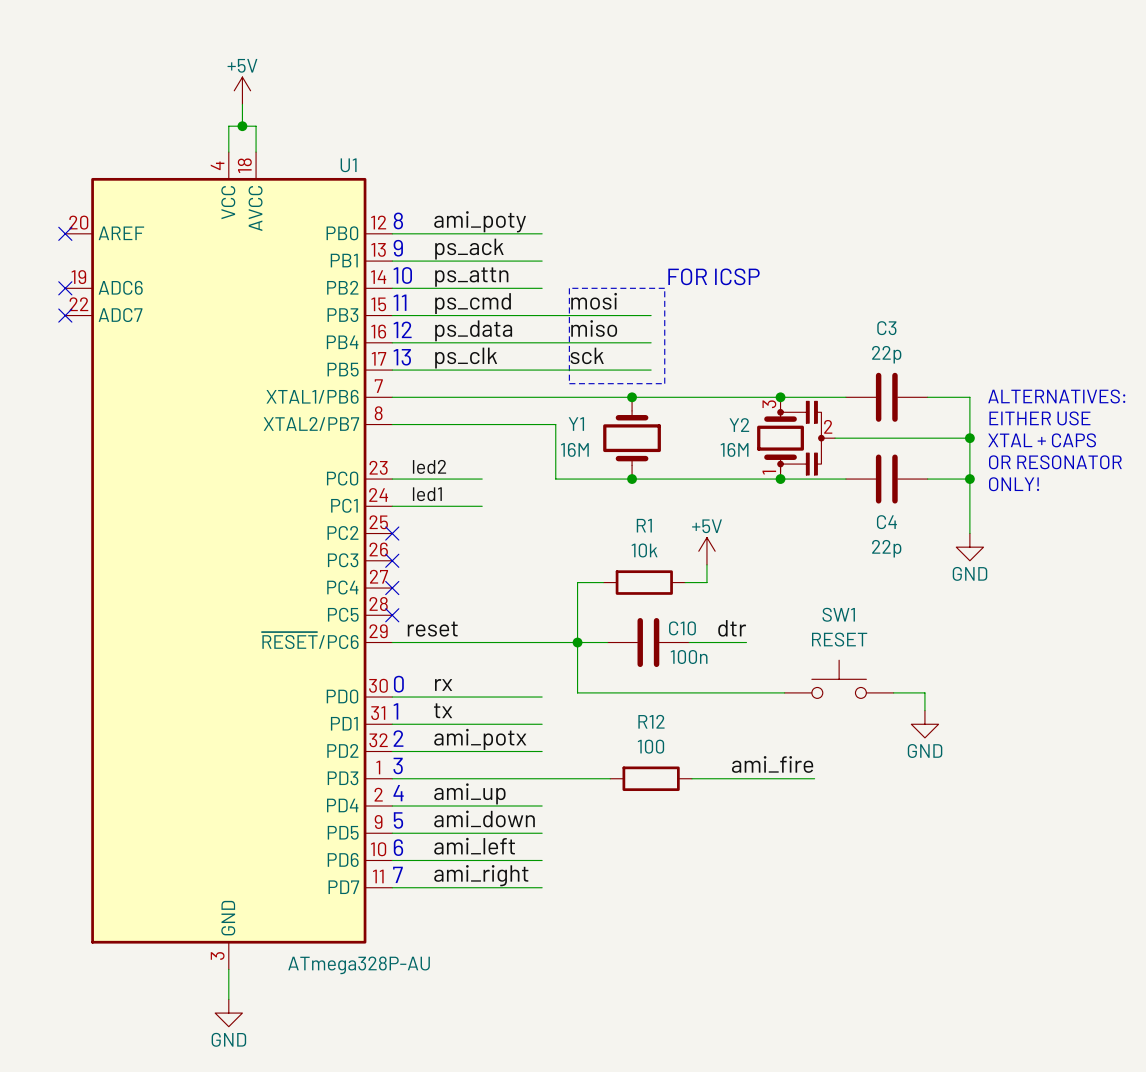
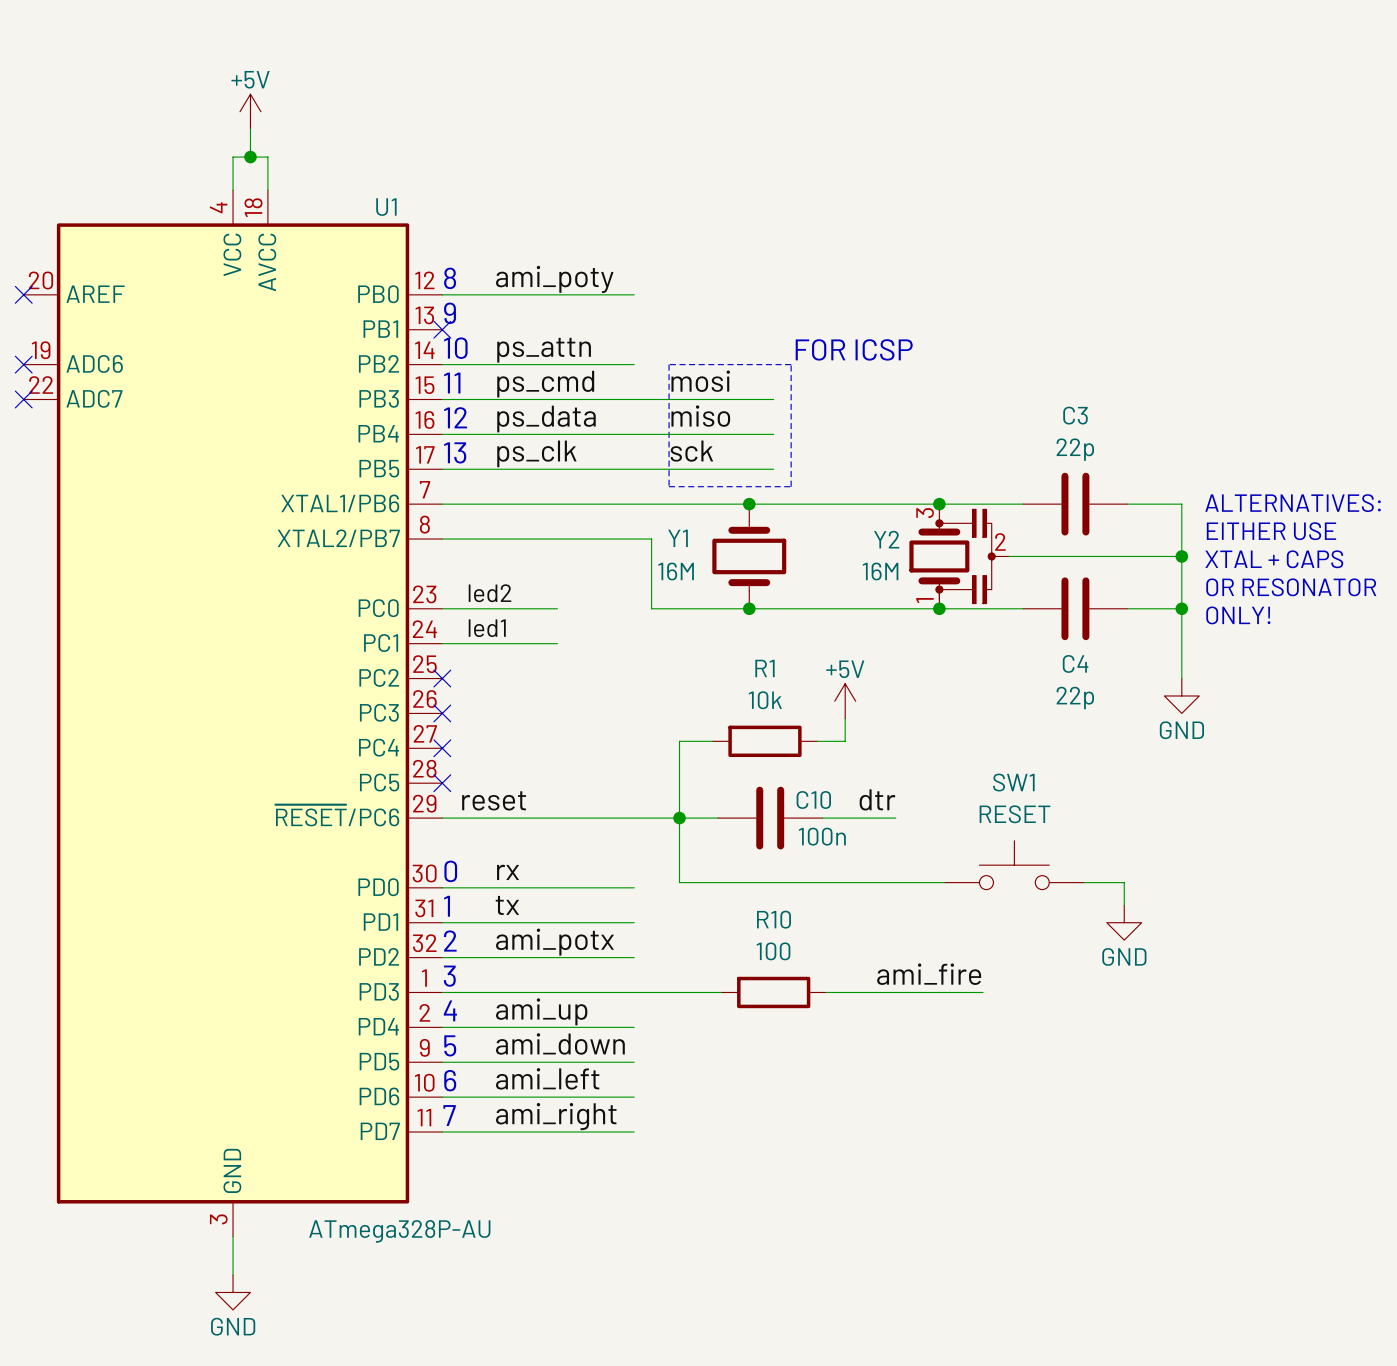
label: ps_ack (469, 249) -> none
wire: (392, 261) (542, 261) -> none
no-connect mark: none -> (442, 329)
R12 name: R12 (651, 721) -> R10 (773, 919)

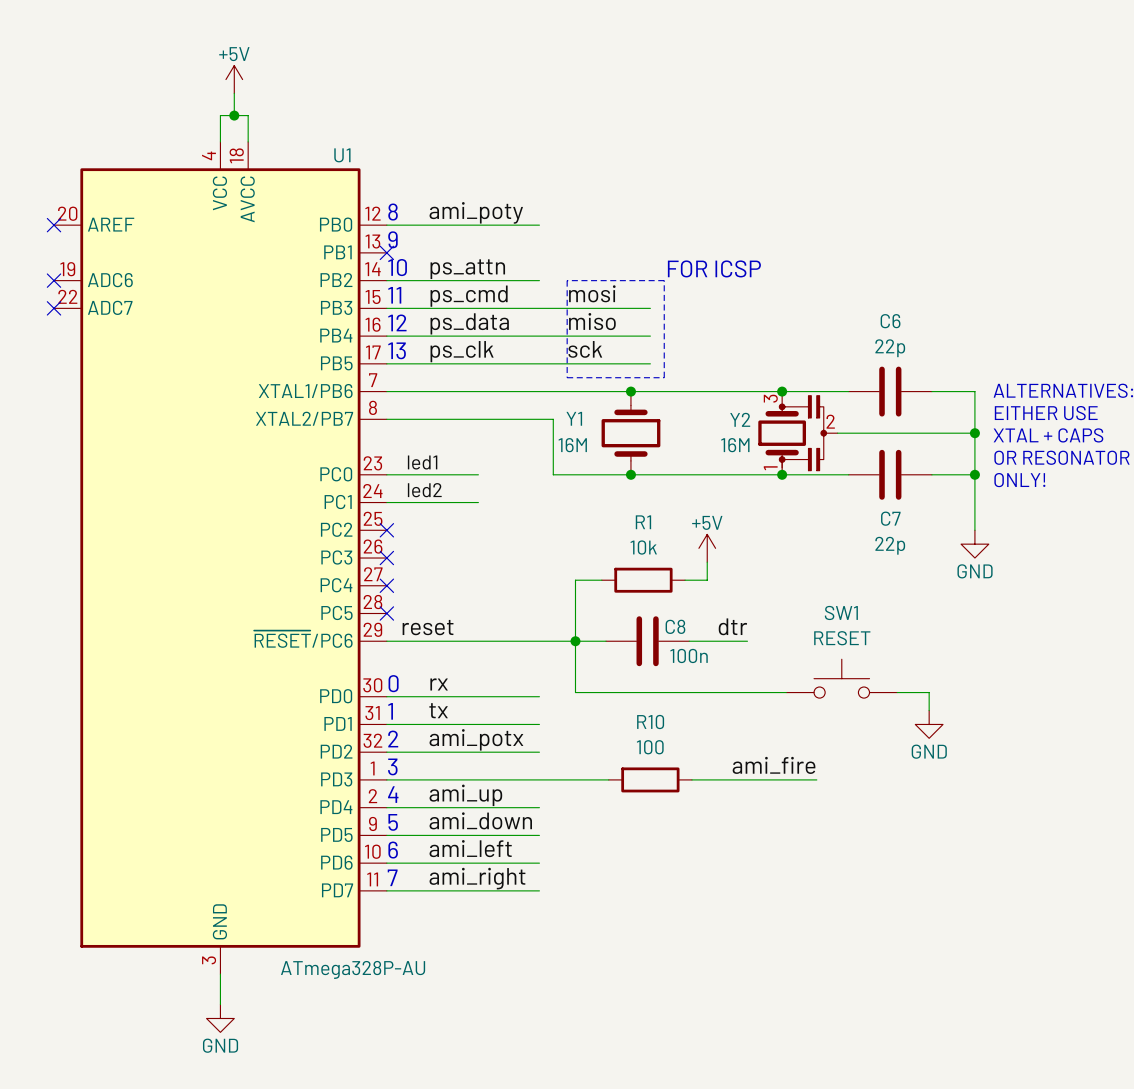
C3 name: C3 (1075, 415) -> C6 (890, 321)
label: led2 (489, 593) -> led1 (422, 462)
label: led1 (487, 628) -> led2 (424, 490)
C4 name: C4 (1075, 663) -> C7 (890, 518)
C10 name: C10 (813, 799) -> C8 (675, 626)

